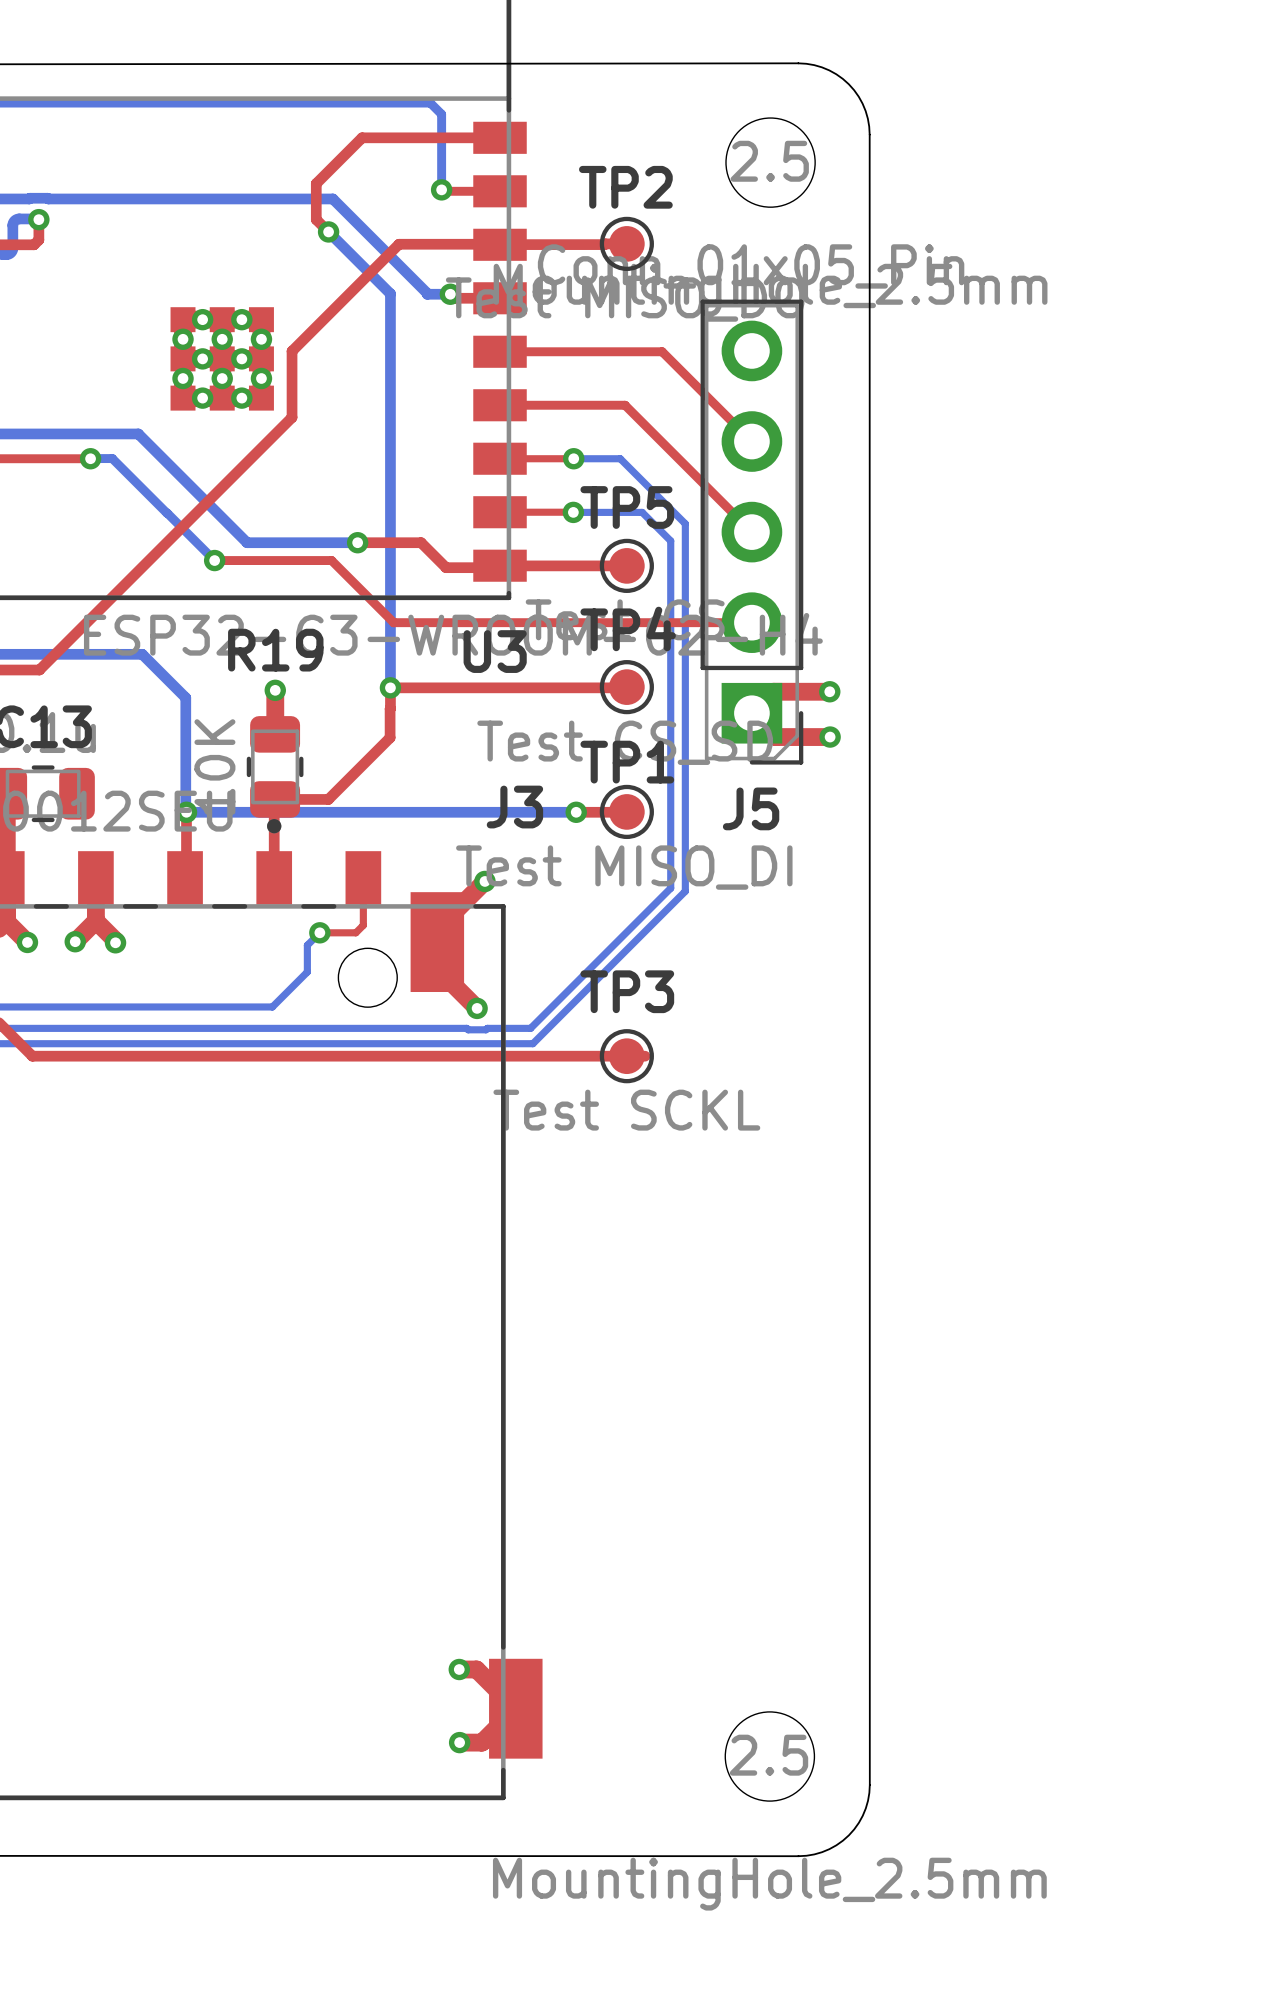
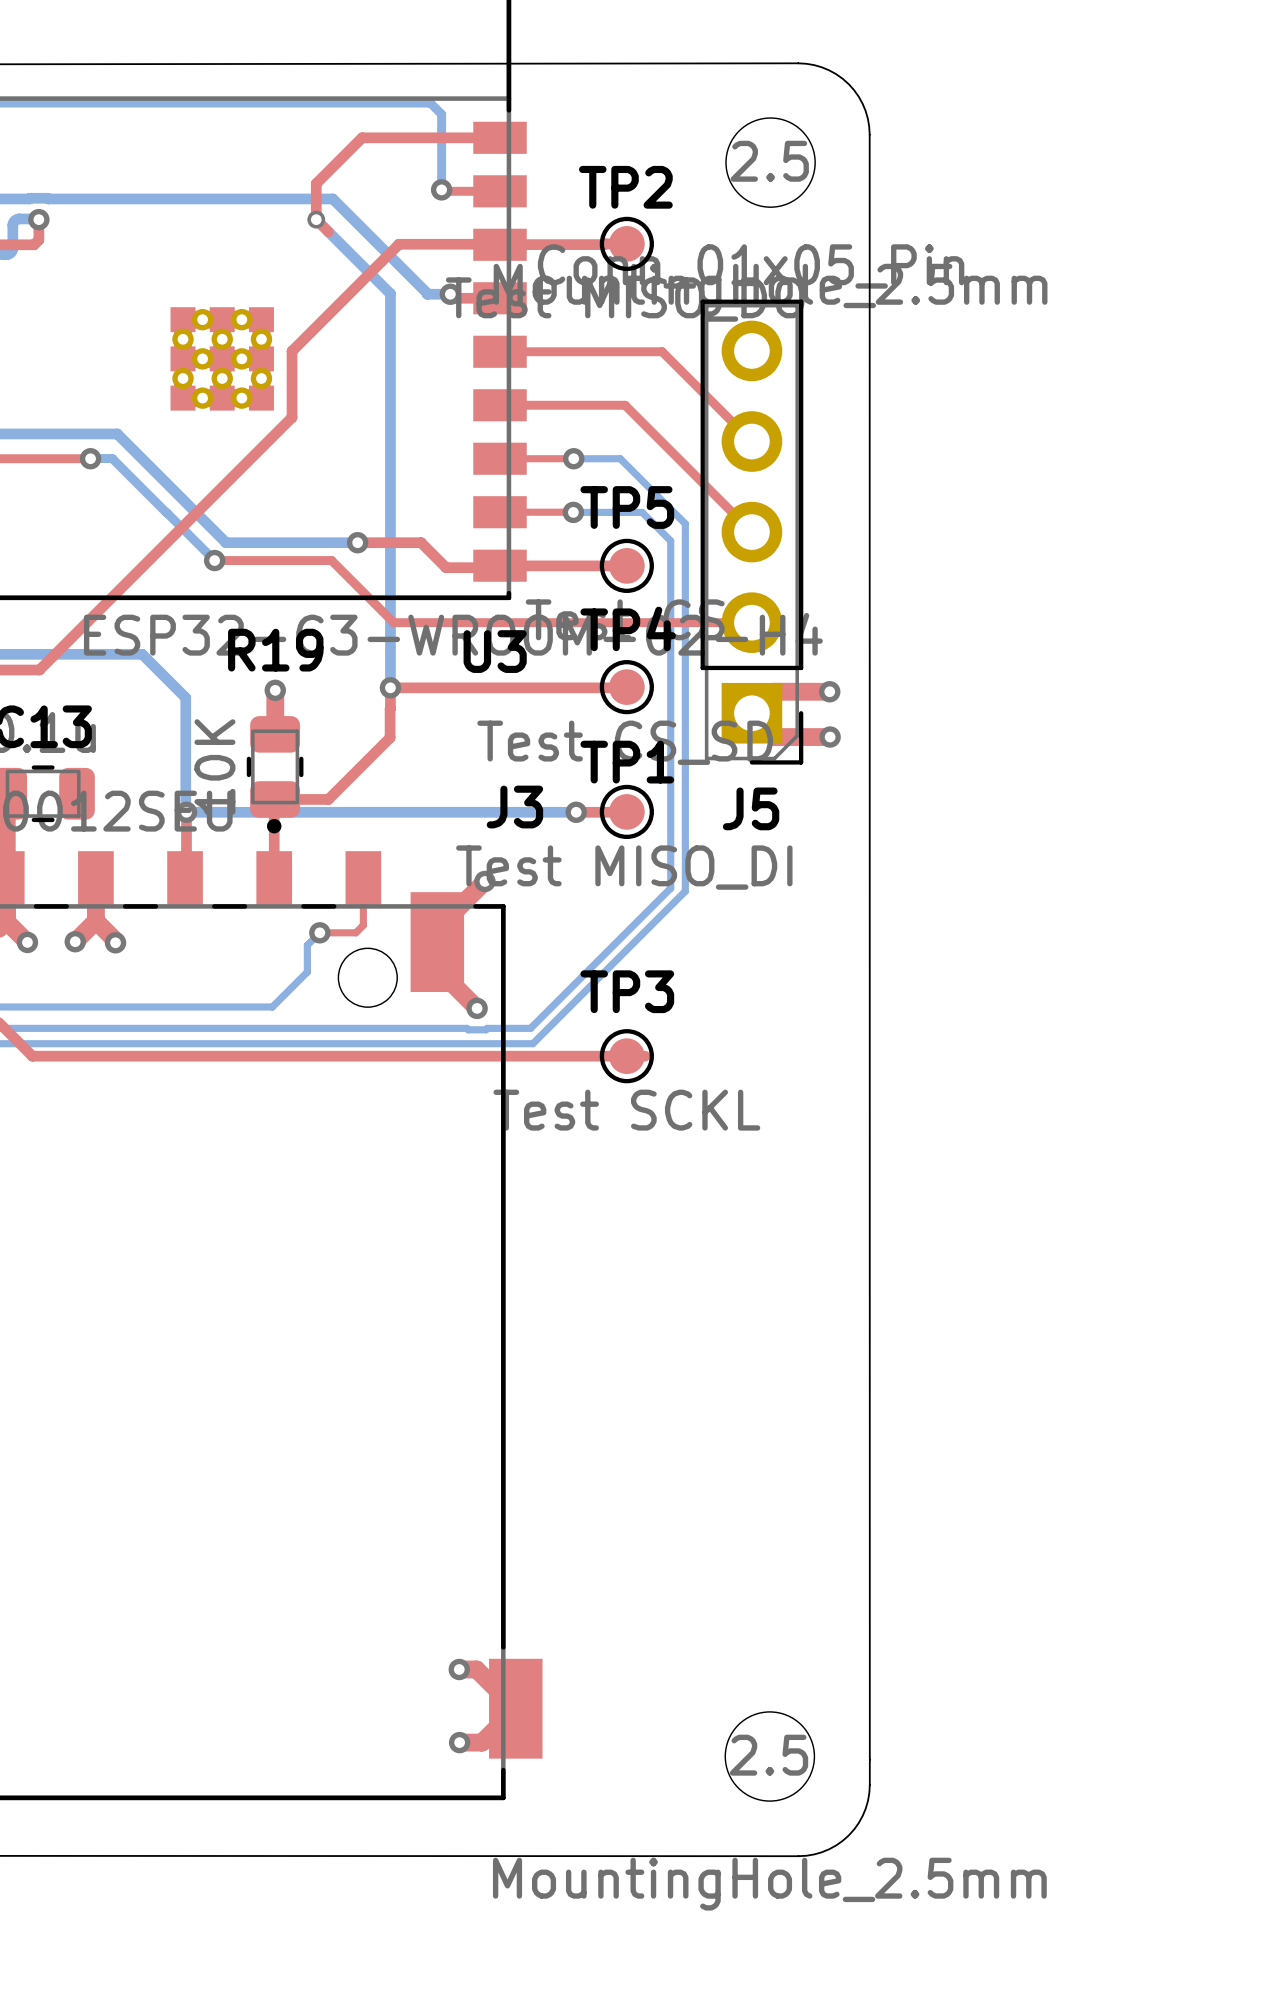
via position: (328, 231) -> (316, 219)
bottom track: (117, 433) (138, 433) (247, 542) -> (117, 433) (226, 542) (247, 542)

